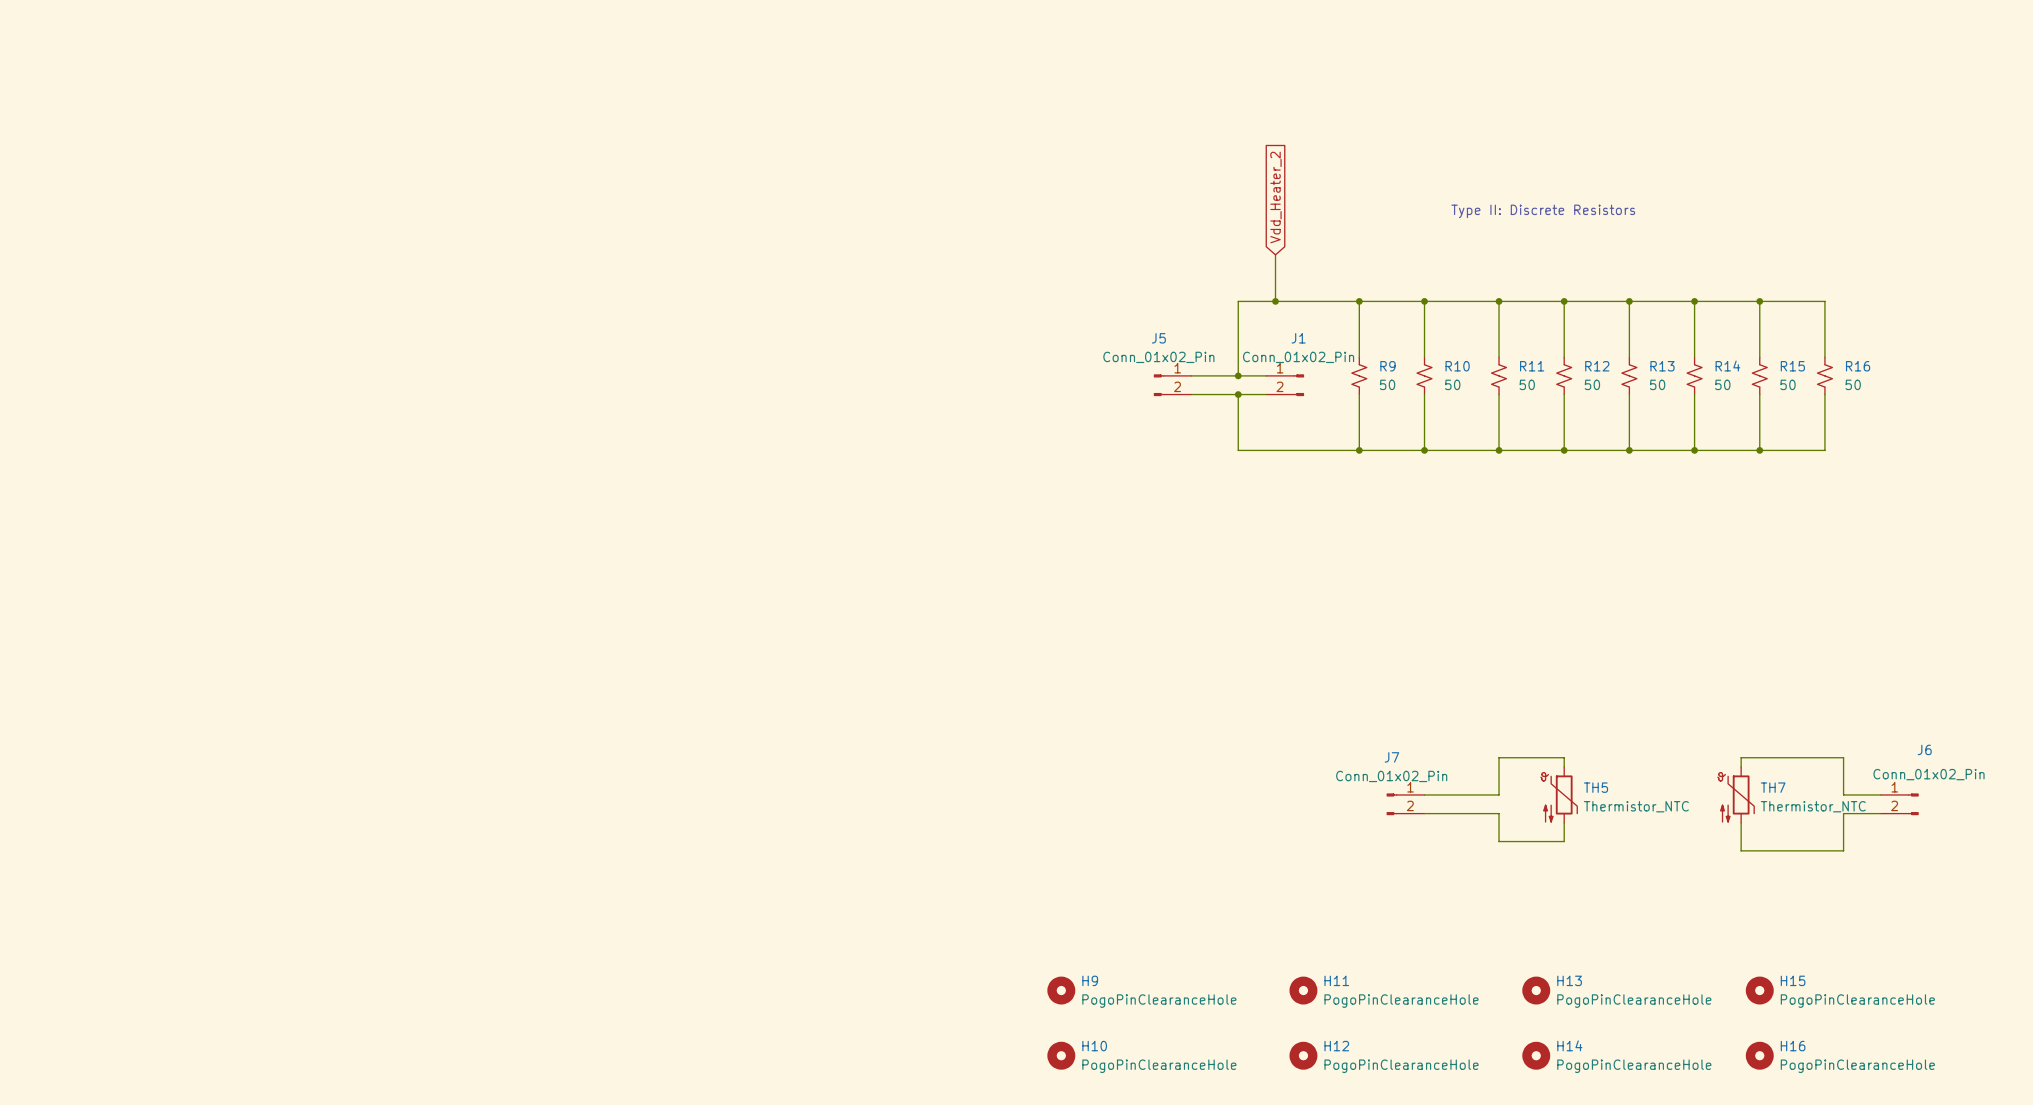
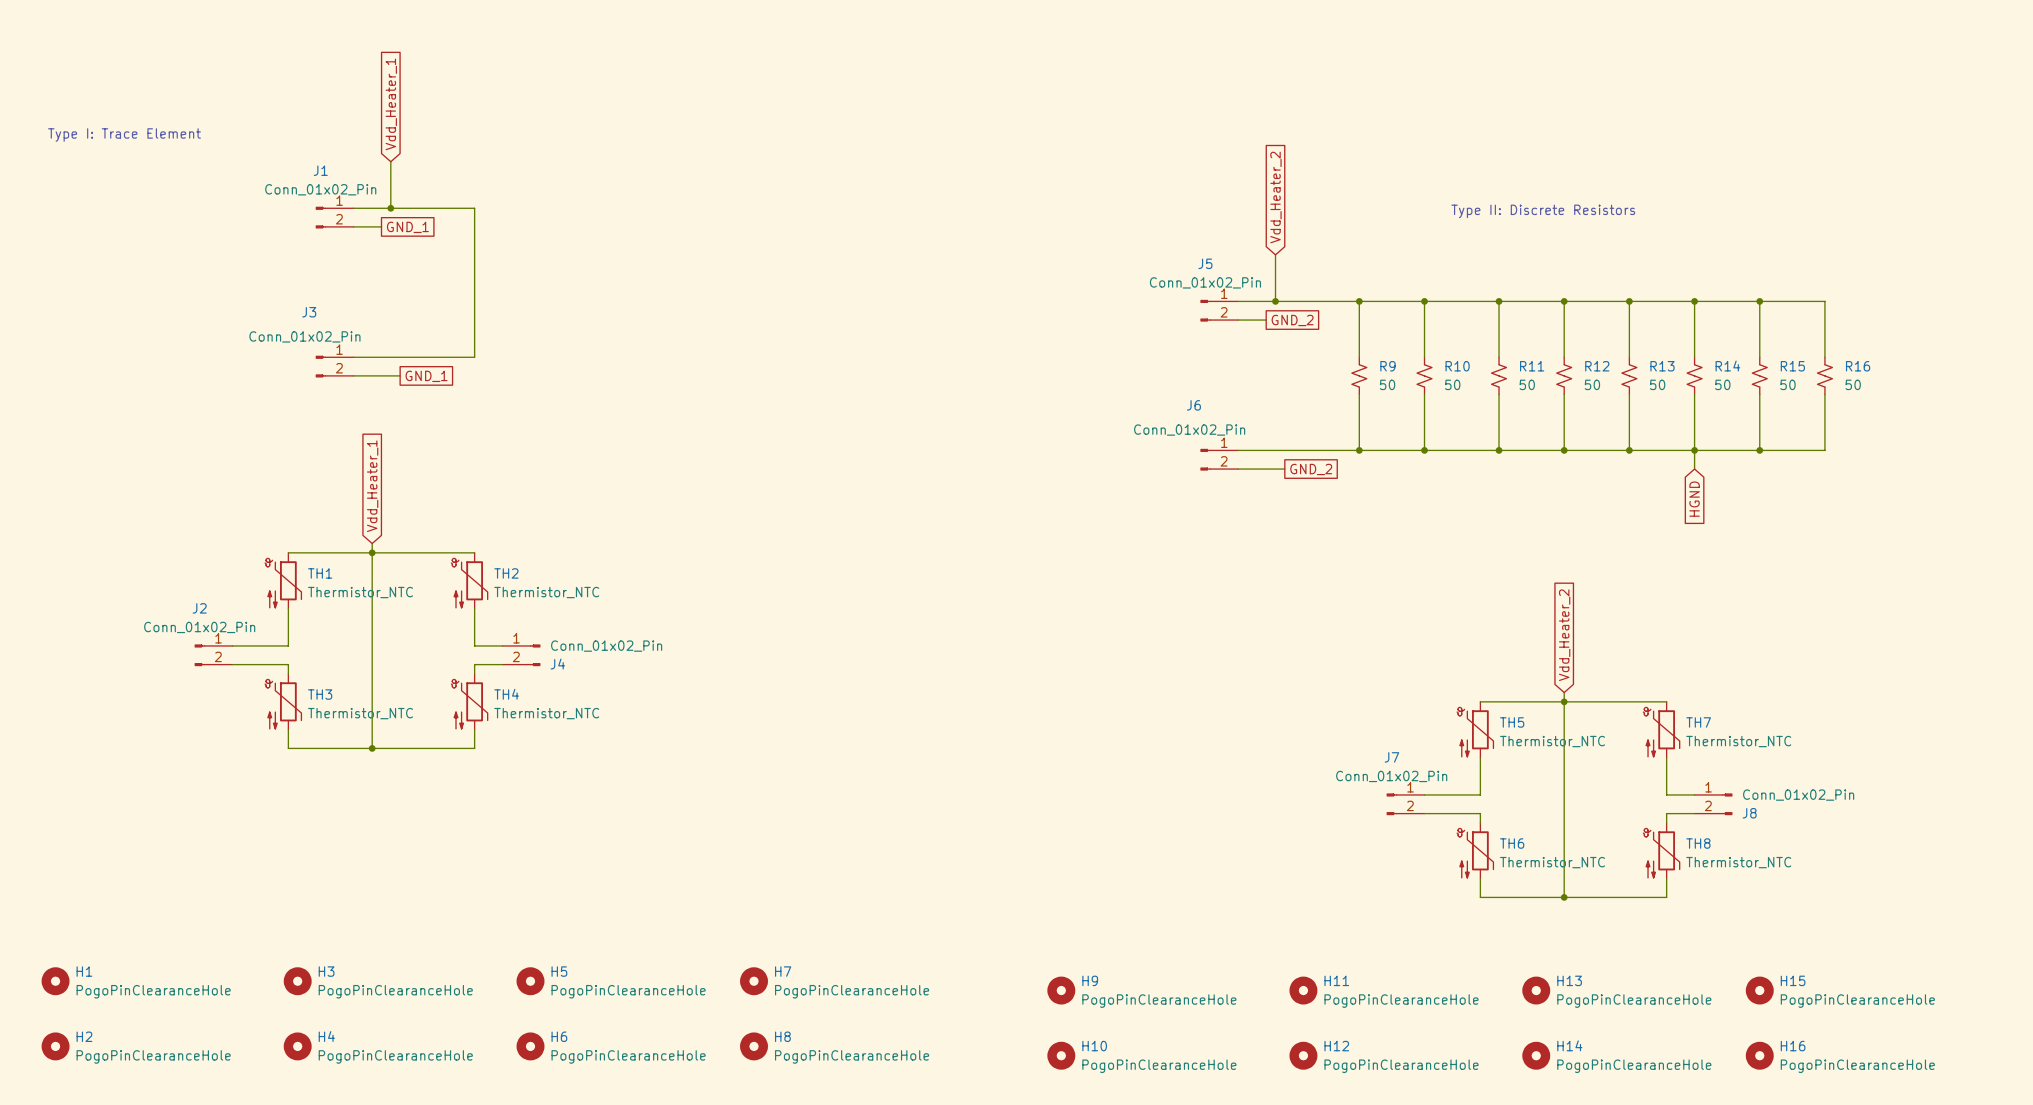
global label: none -> Vdd_Heater_1 (391, 104)
text: none -> Type I: Trace Element (124, 135)
wire: none -> (390, 161) (390, 208)
wire: none -> (353, 208) (474, 208) (474, 357) (353, 357)
junction: none -> (390, 208)
wire: none -> (353, 226) (381, 226)
global label: none -> GND_1 (407, 227)
wire: (1238, 301) (1238, 375) -> none
wire: none -> (1238, 320) (1266, 320)
global label: none -> GND_2 (1292, 320)
J3: none -> Conn_01x02_Pin (334, 366)
wire: none -> (353, 375) (400, 375)
wire: (1191, 375) (1266, 375) -> none
junction: (1238, 375) -> none
global label: none -> GND_1 (426, 376)
J5 position: (1172, 385) -> (1219, 310)
J1 position: (1285, 385) -> (334, 217)
J1 flip: as is (1298, 385) -> left-right (320, 217)
wire: (1191, 394) (1266, 394) -> none
wire: (1238, 394) (1238, 450) -> none
junction: (1238, 394) -> none
wire: none -> (1694, 450) (1694, 469)
wire: none -> (1238, 469) (1284, 469)
global label: none -> GND_2 (1311, 469)
global label: none -> Vdd_Heater_1 (372, 486)
global label: none -> HGND (1694, 499)
wire: none -> (372, 543) (372, 748)
wire: none -> (288, 552) (474, 552)
junction: none -> (372, 552)
TH1: none -> Thermistor_NTC (283, 580)
TH2: none -> Thermistor_NTC (469, 580)
wire: none -> (288, 608) (288, 645) (232, 645)
wire: none -> (474, 608) (474, 645) (502, 645)
global label: none -> Vdd_Heater_2 (1564, 635)
J2: none -> Conn_01x02_Pin (213, 655)
J4: none -> Conn_01x02_Pin (521, 655)
wire: none -> (232, 664) (288, 664) (288, 673)
wire: none -> (502, 664) (474, 664) (474, 673)
wire: none -> (1564, 692) (1564, 757)
TH3: none -> Thermistor_NTC (283, 701)
TH4: none -> Thermistor_NTC (469, 701)
wire: none -> (1480, 701) (1666, 701)
junction: none -> (1564, 701)
wire: none -> (288, 729) (288, 748) (474, 748) (474, 729)
junction: none -> (372, 748)
wire: (1564, 757) (1499, 757) (1499, 794) (1480, 794) -> (1480, 757) (1480, 794)
wire: none -> (1666, 757) (1666, 794) (1694, 794)
wire: none -> (1564, 767) (1564, 822)
wire: (1741, 767) (1741, 757) (1843, 757) (1843, 794) (1880, 794) -> none
TH5 position: (1559, 794) -> (1475, 729)
TH7 position: (1736, 794) -> (1661, 729)
J8: none -> Conn_01x02_Pin (1713, 804)
J6 position: (1899, 804) -> (1219, 459)
J6 flip: as is (1913, 804) -> left-right (1205, 459)
wire: (1480, 813) (1499, 813) (1499, 841) (1564, 841) -> (1480, 813) (1480, 822)
wire: none -> (1694, 813) (1666, 813) (1666, 822)
wire: (1880, 813) (1843, 813) (1843, 850) (1741, 850) (1741, 822) -> none
wire: none -> (1564, 841) (1564, 897)
TH6: none -> Thermistor_NTC (1475, 850)
TH8: none -> Thermistor_NTC (1661, 850)
wire: none -> (1480, 878) (1480, 897) (1666, 897) (1666, 878)
junction: none -> (1564, 897)
H1: none -> PogoPinClearanceHole (55, 981)
H3: none -> PogoPinClearanceHole (297, 981)
H5: none -> PogoPinClearanceHole (530, 981)
H7: none -> PogoPinClearanceHole (754, 981)
H2: none -> PogoPinClearanceHole (55, 1046)
H4: none -> PogoPinClearanceHole (297, 1046)
H6: none -> PogoPinClearanceHole (530, 1046)
H8: none -> PogoPinClearanceHole (754, 1046)

